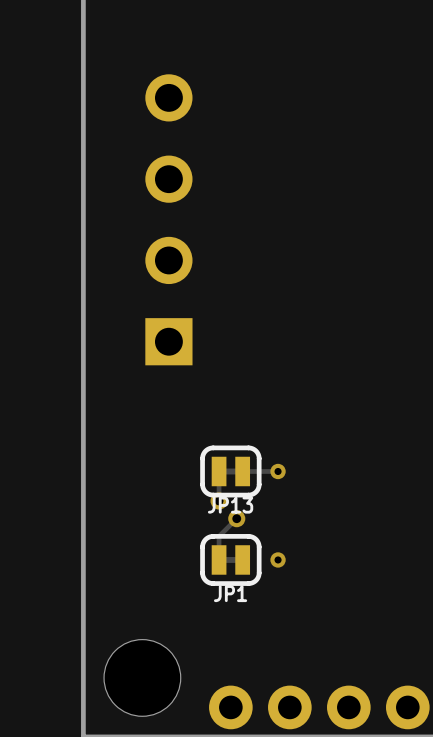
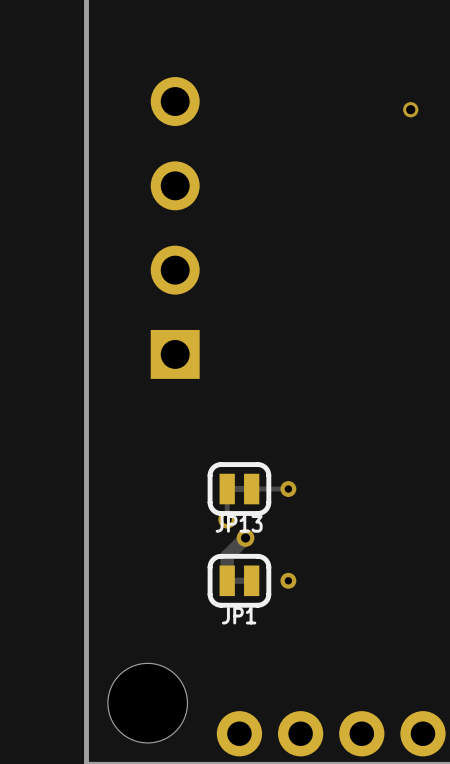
via: none -> (410, 109)
track width: thin (236, 518) (219, 536) (219, 546) -> thick (245, 537) (227, 556) (227, 567)

